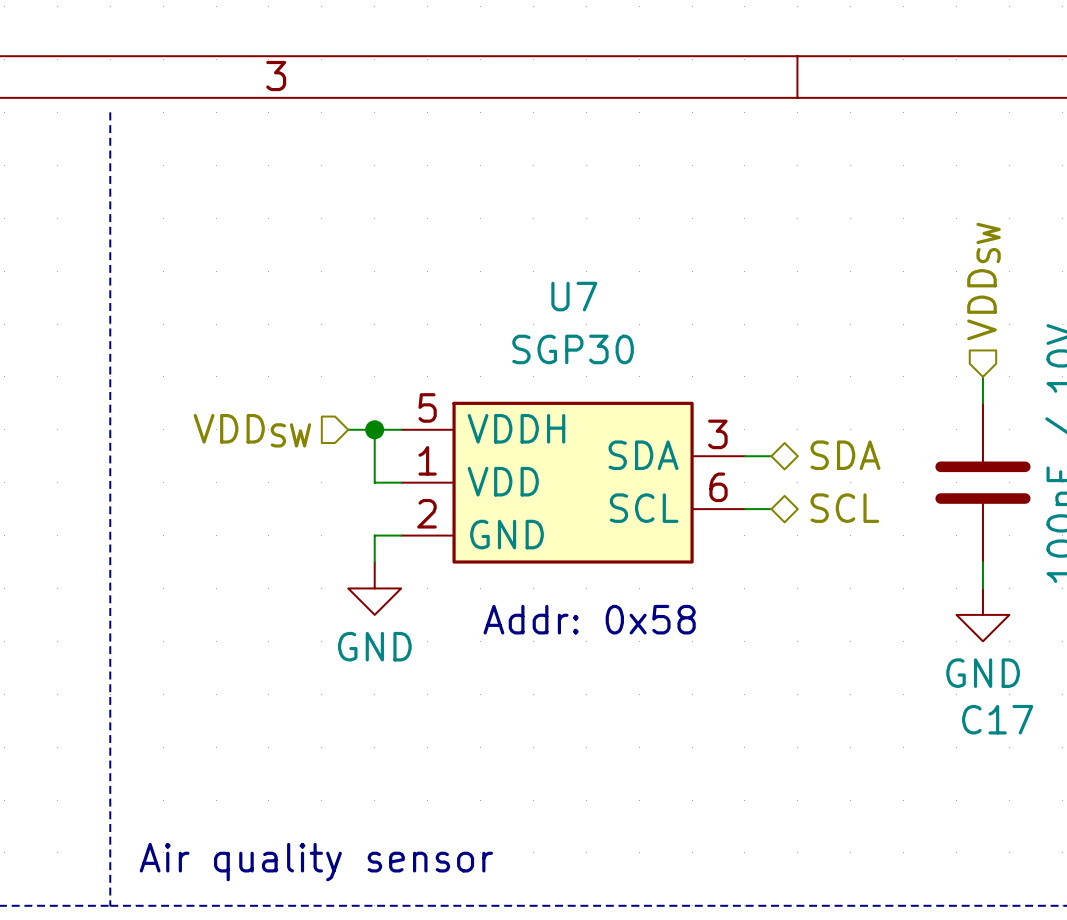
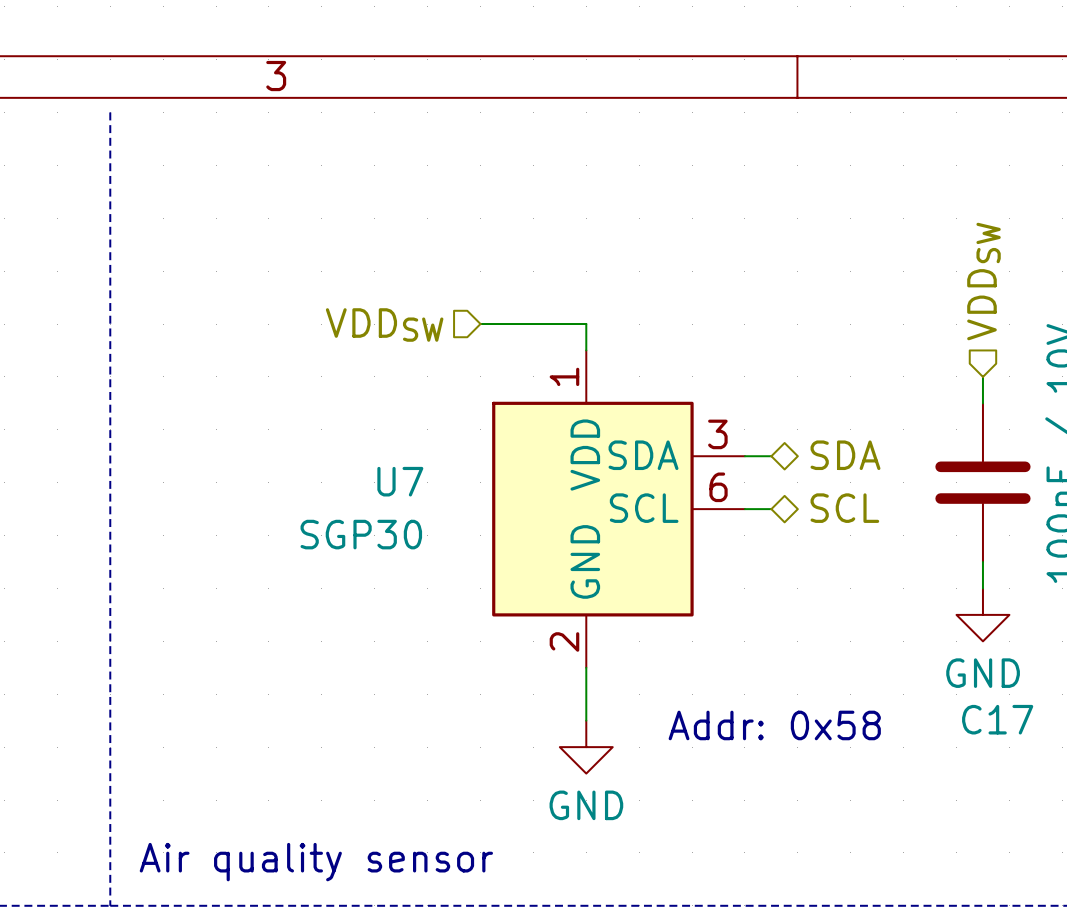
U7 name position: U7 (574, 296) -> U7 (400, 481)
wire: none -> (480, 324) (586, 324) (586, 350)
U7 value position: SGP30 (573, 349) -> SGP30 (361, 534)
U7 symbol: [401, 401, 745, 564] -> [492, 350, 745, 668]
wire: (348, 429) (401, 429) -> none
wire: (374, 429) (374, 482) (401, 482) -> none
junction: (374, 429) -> none
hierarchical label position: VDDSW (252, 430) -> VDDSW (384, 324)
wire: (401, 535) (374, 535) (374, 562) -> none
power symbol position: GND (374, 588) -> GND (586, 747)
text position: Addr: 0x58 (589, 619) -> Addr: 0x58 (774, 725)
wire: none -> (586, 667) (586, 720)

